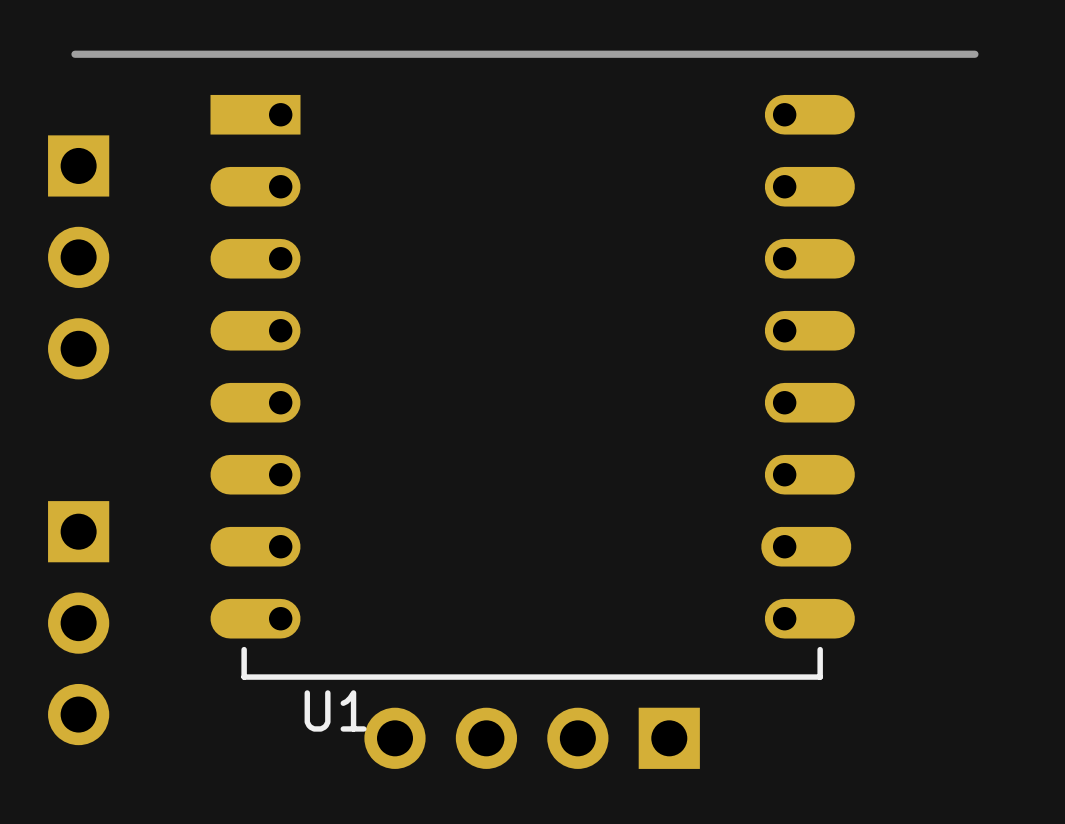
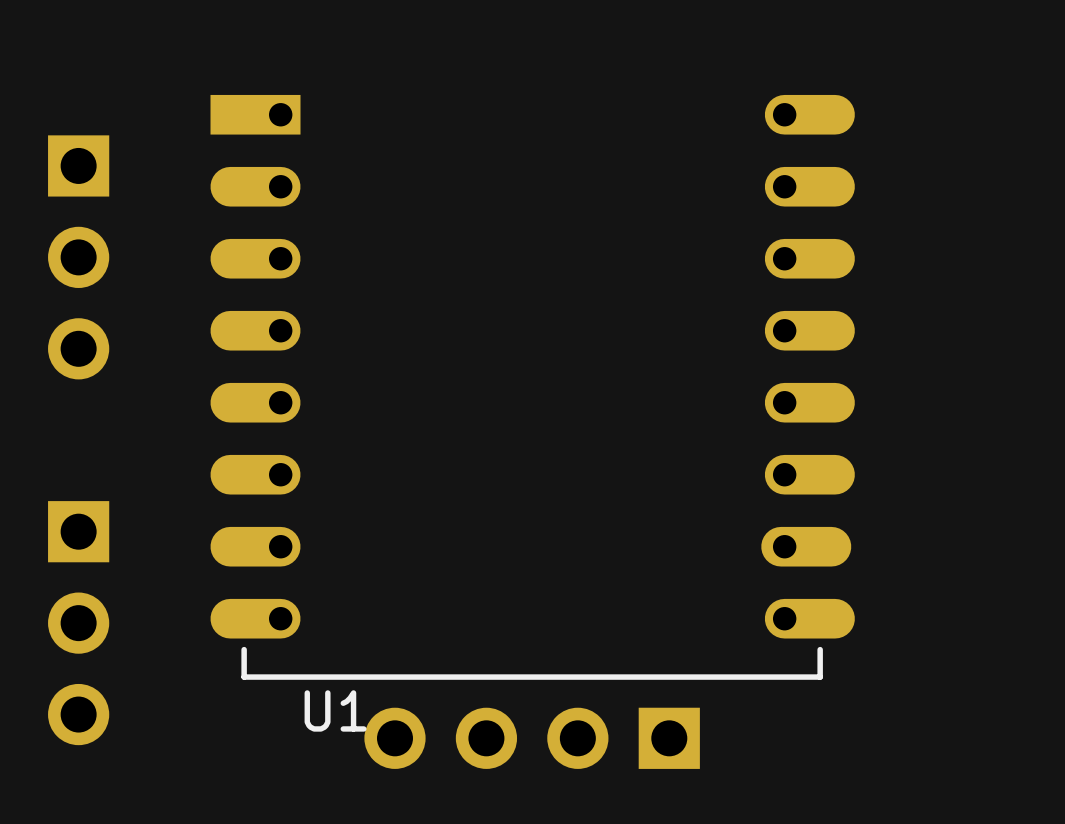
board edge: (974, 54) (74, 54) -> none

